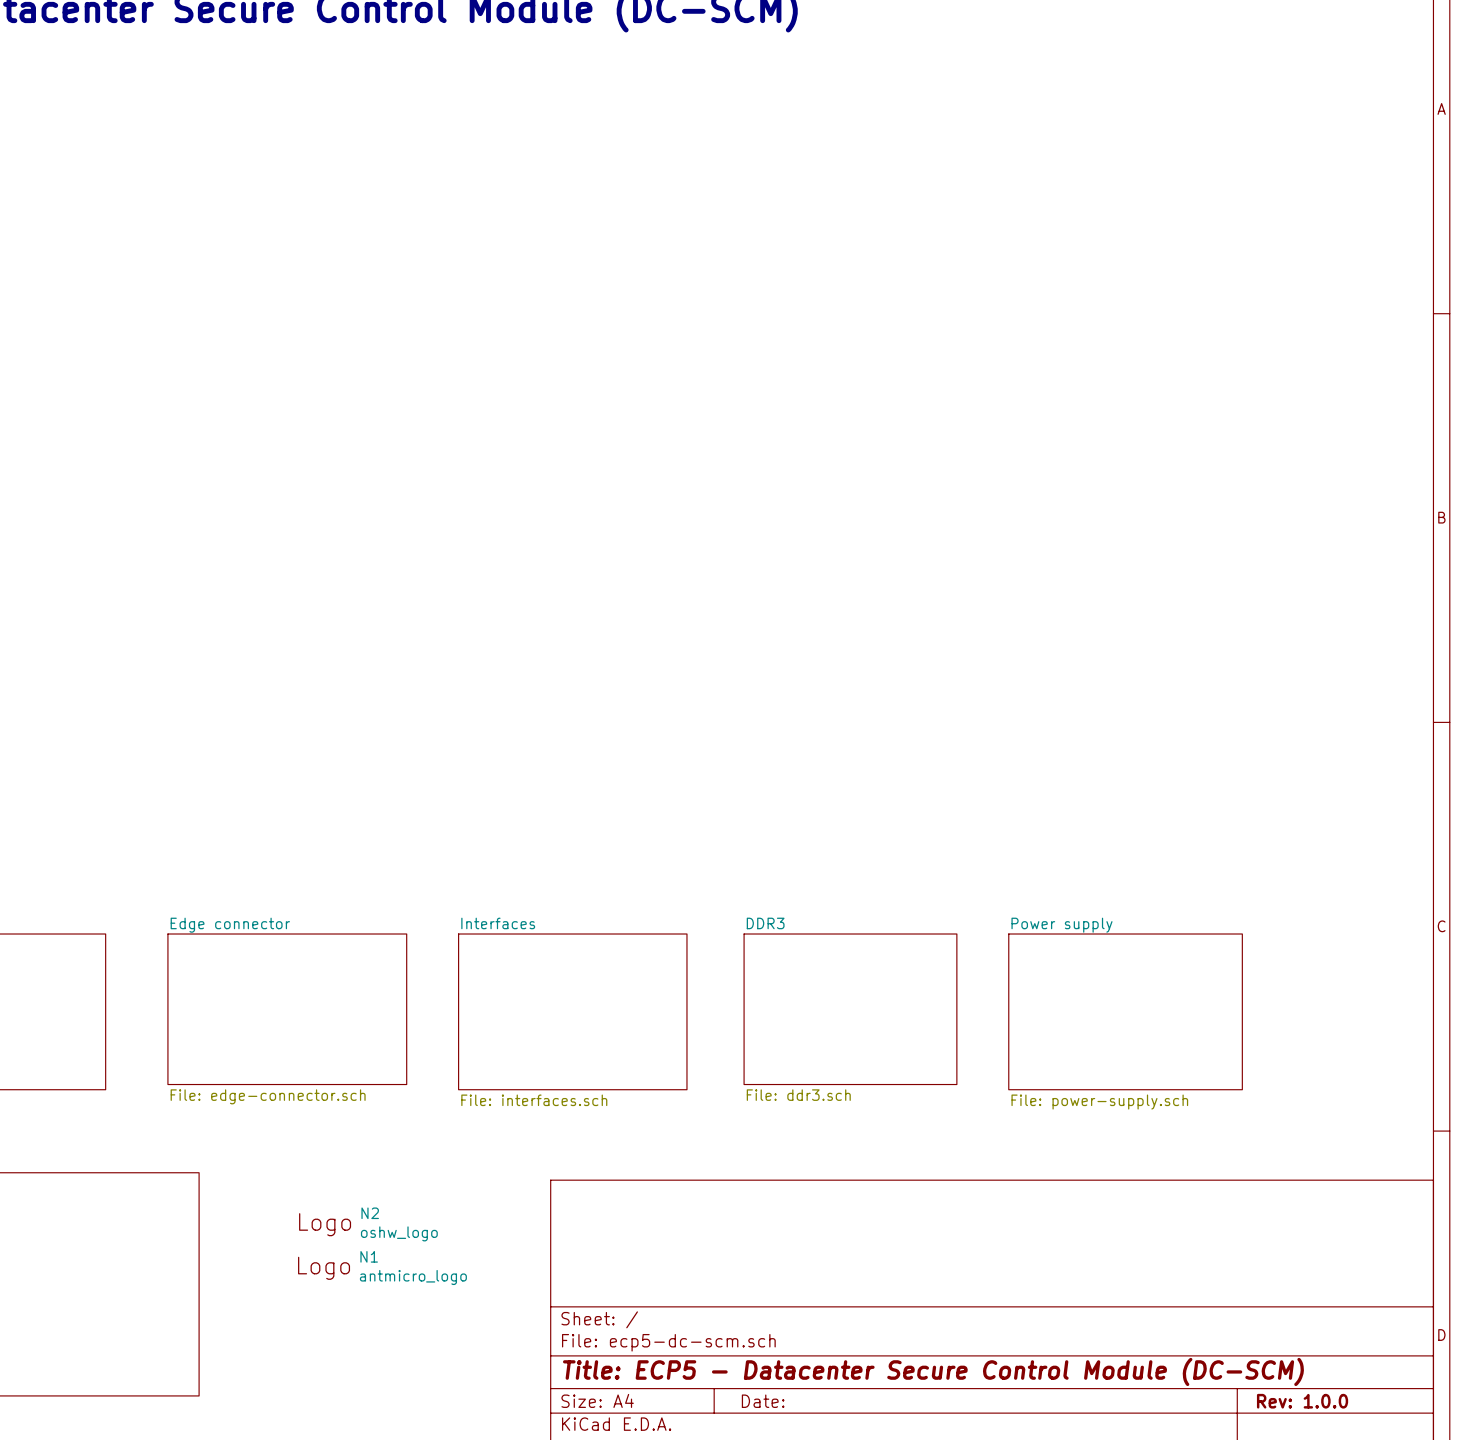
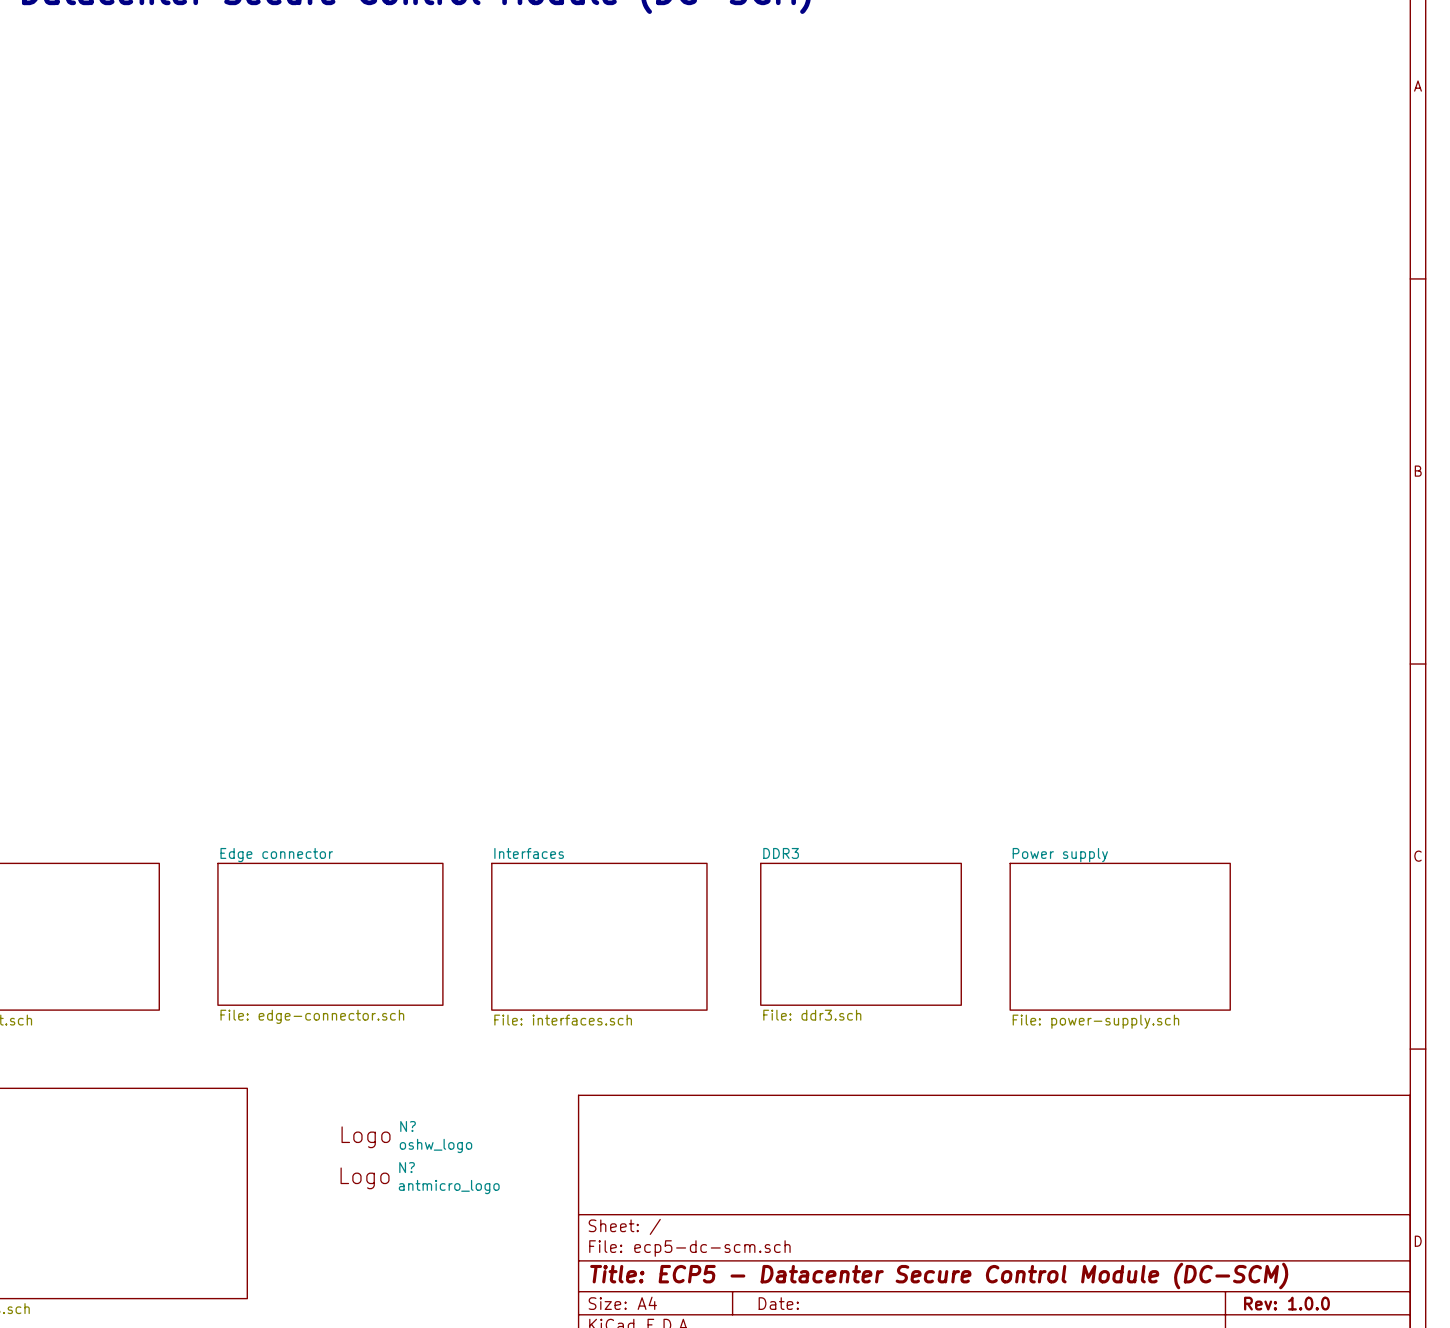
N2 name: N2 (370, 1213) -> N? (408, 1126)
N1 name: N1 (369, 1256) -> N? (407, 1167)

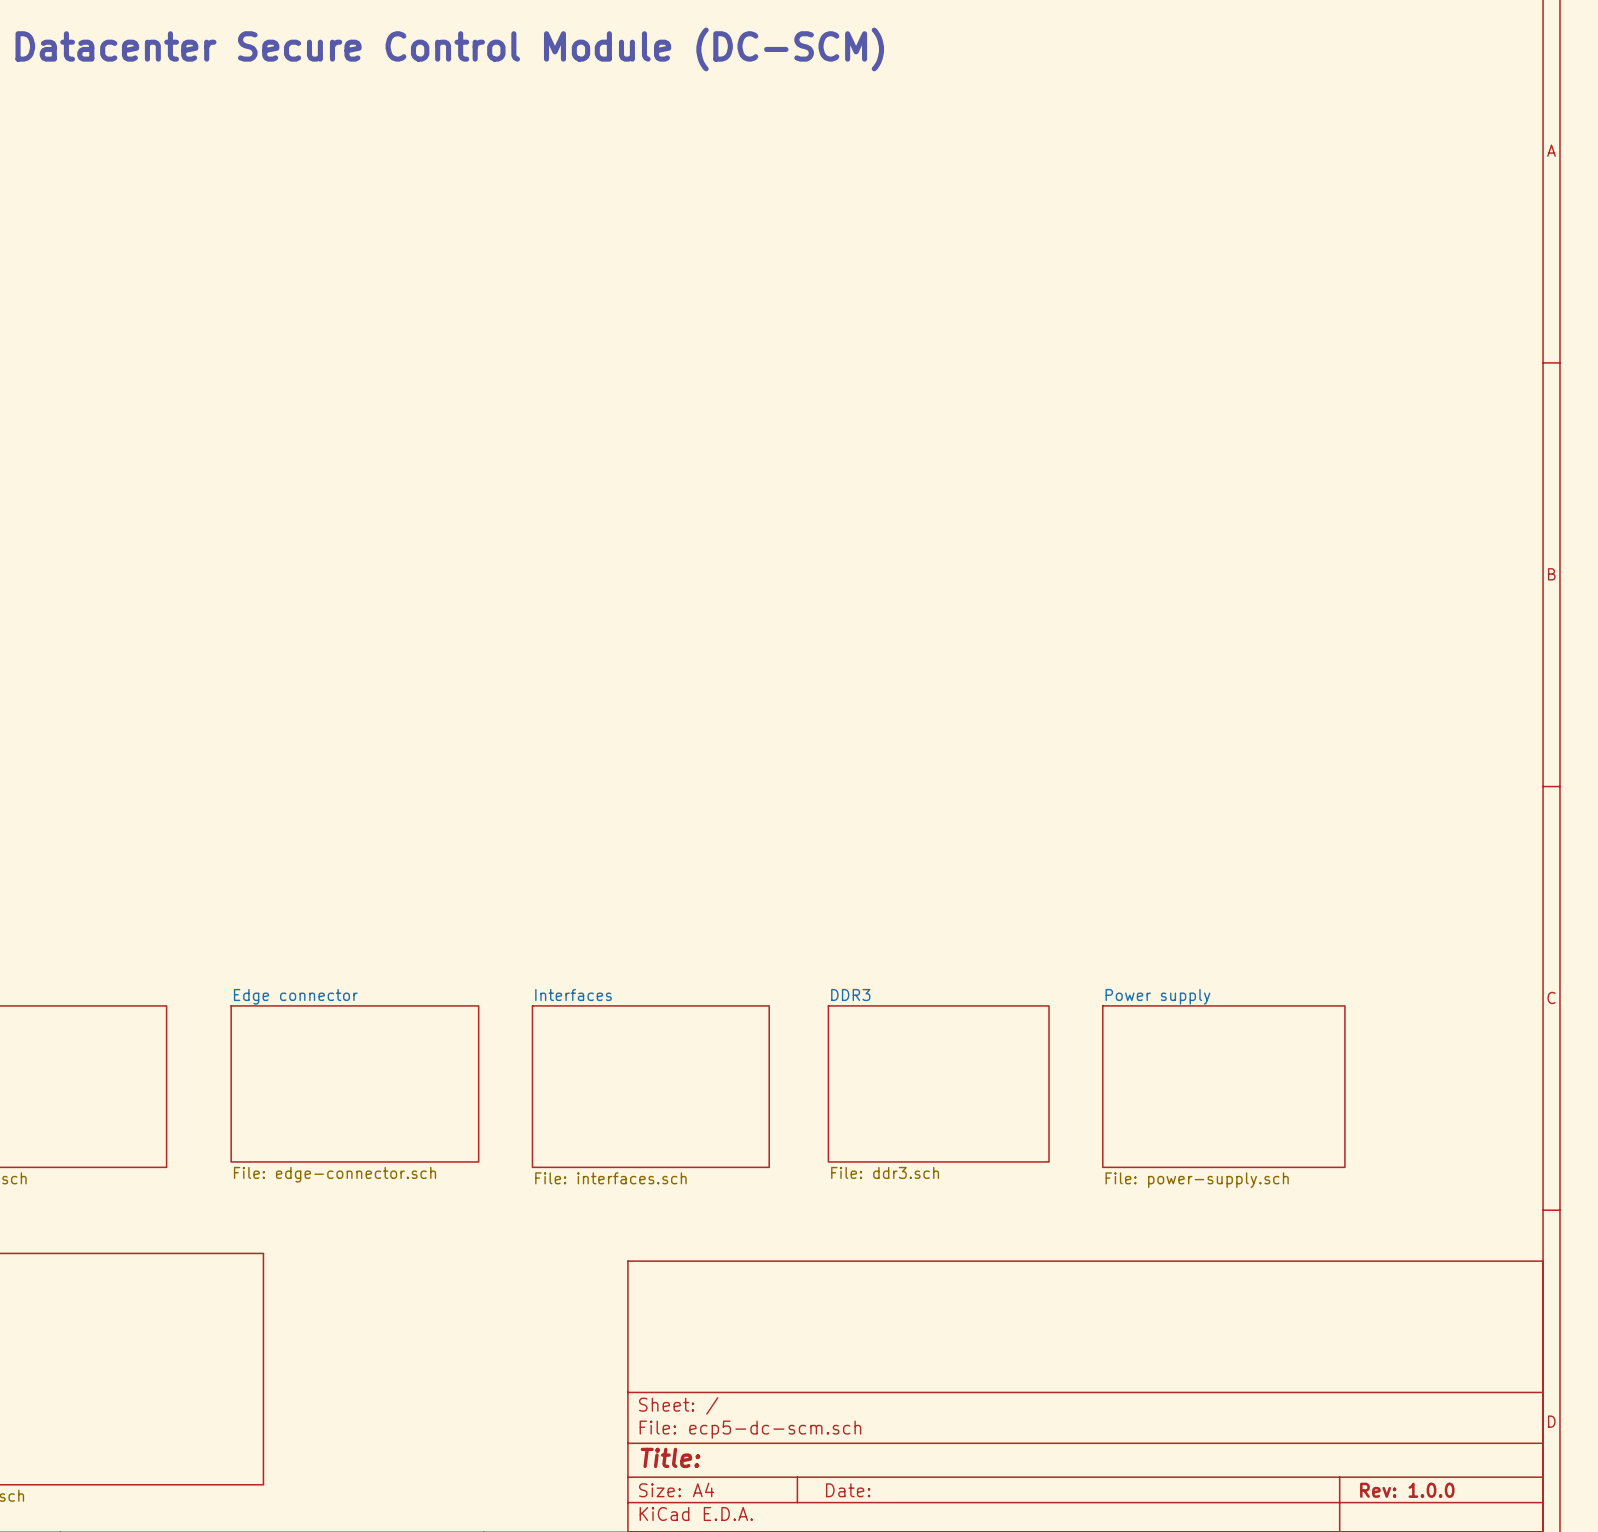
N?: oshw_logo (406, 1137) -> none
N?: antmicro_logo (420, 1178) -> none
title block: Title: ECP5 - Datacenter Secure Control Module (DC-SCM) (939, 1276) -> Title: (670, 1457)

